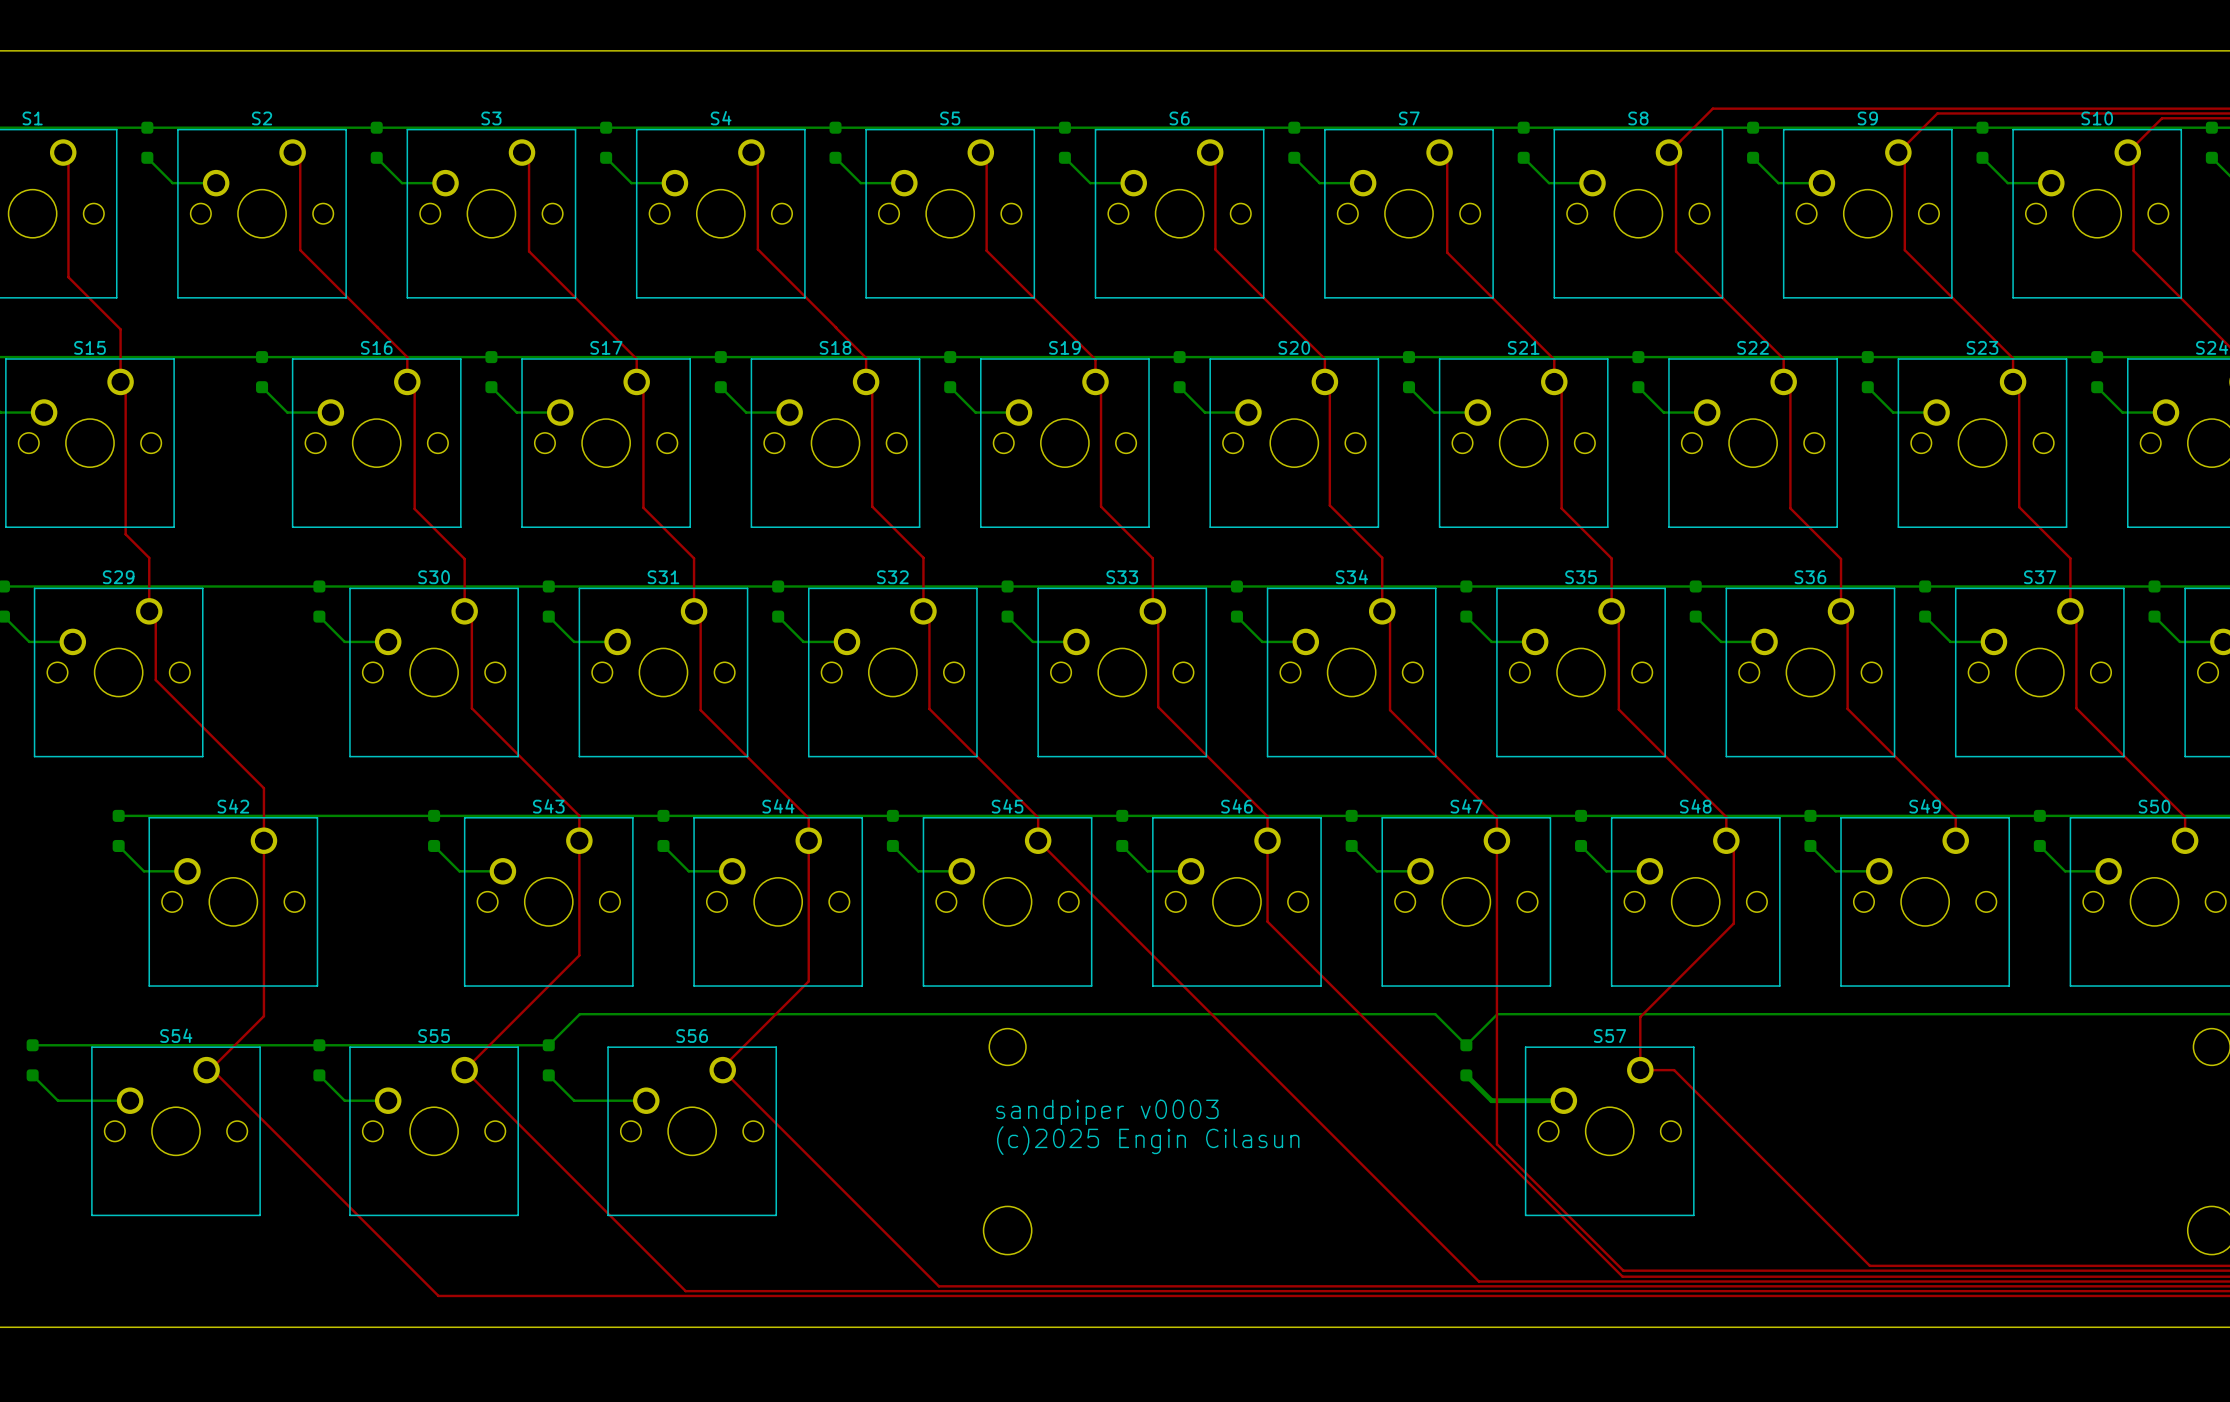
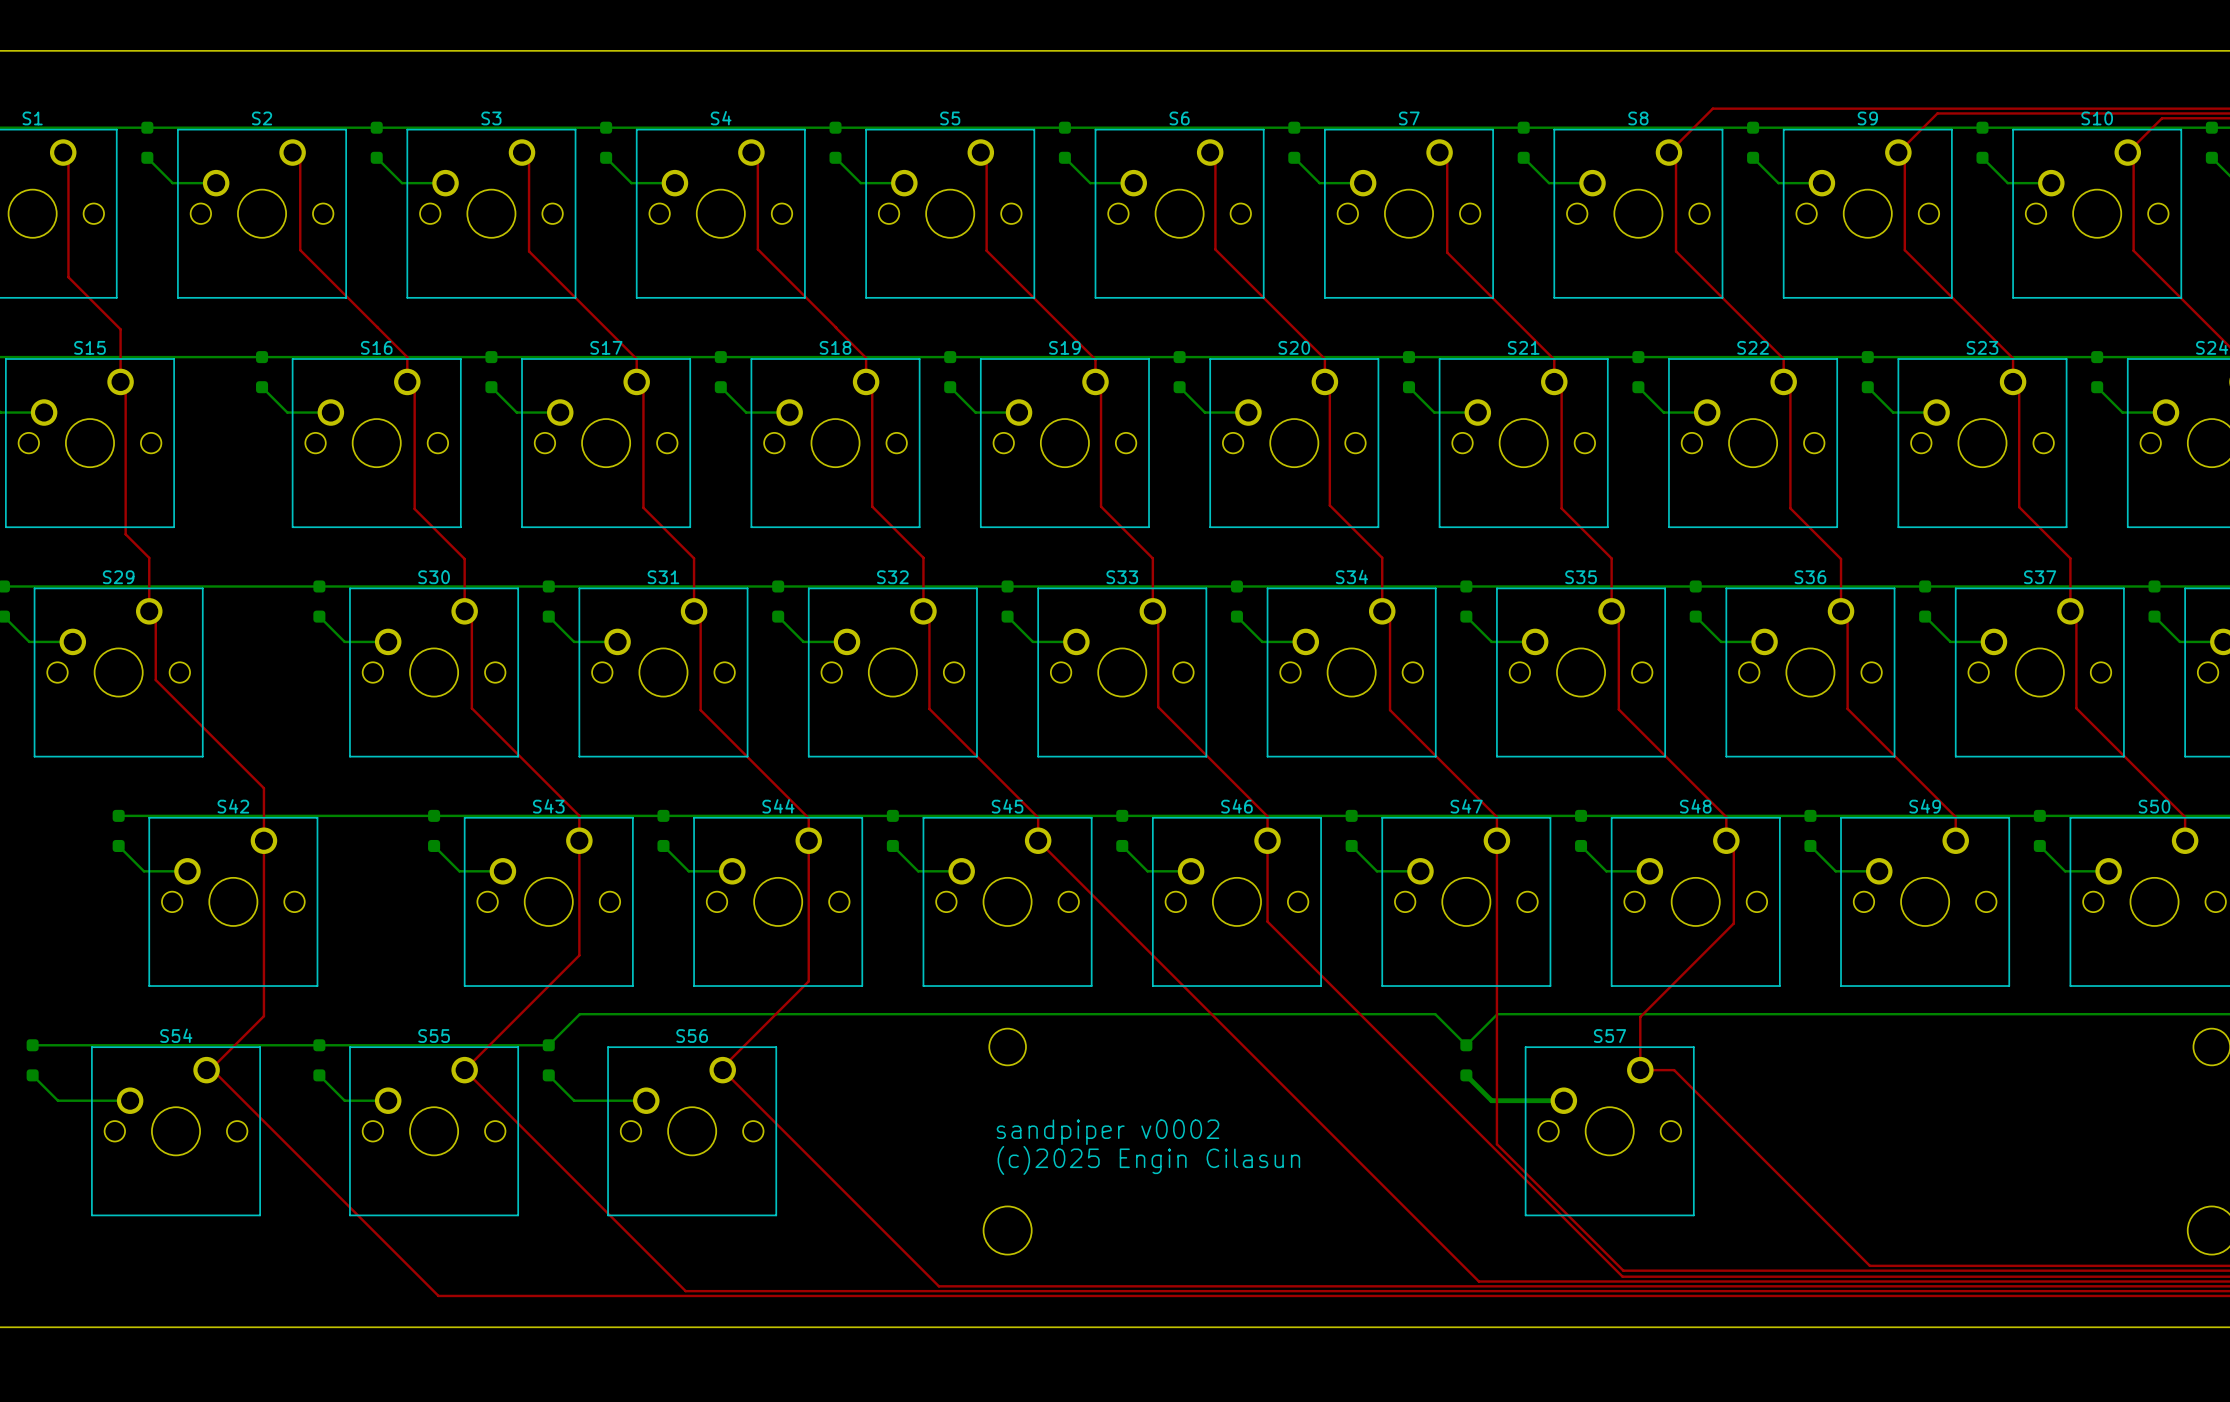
text: sandpiper v0003 (1107, 1112) -> none
text: (c)2025 Engin Cilasun (1148, 1140) -> sandpiper v0002 (1108, 1132)
text: none -> (c)2025 Engin Cilasun (1148, 1160)

